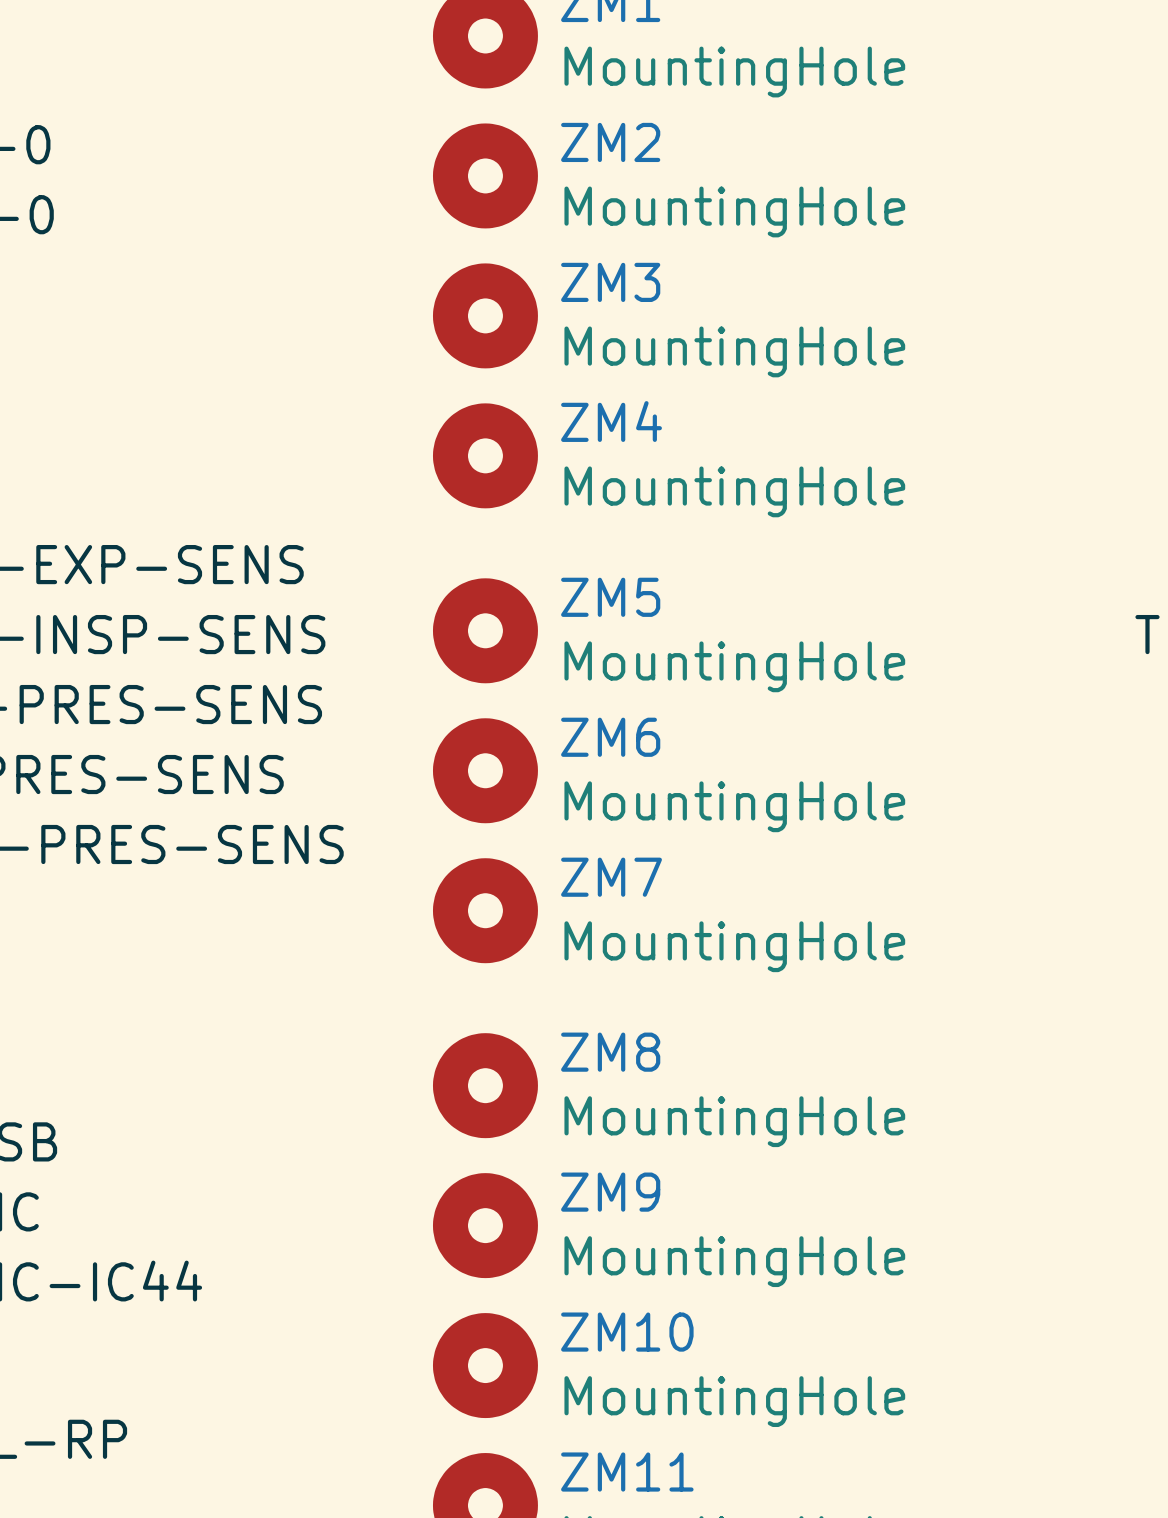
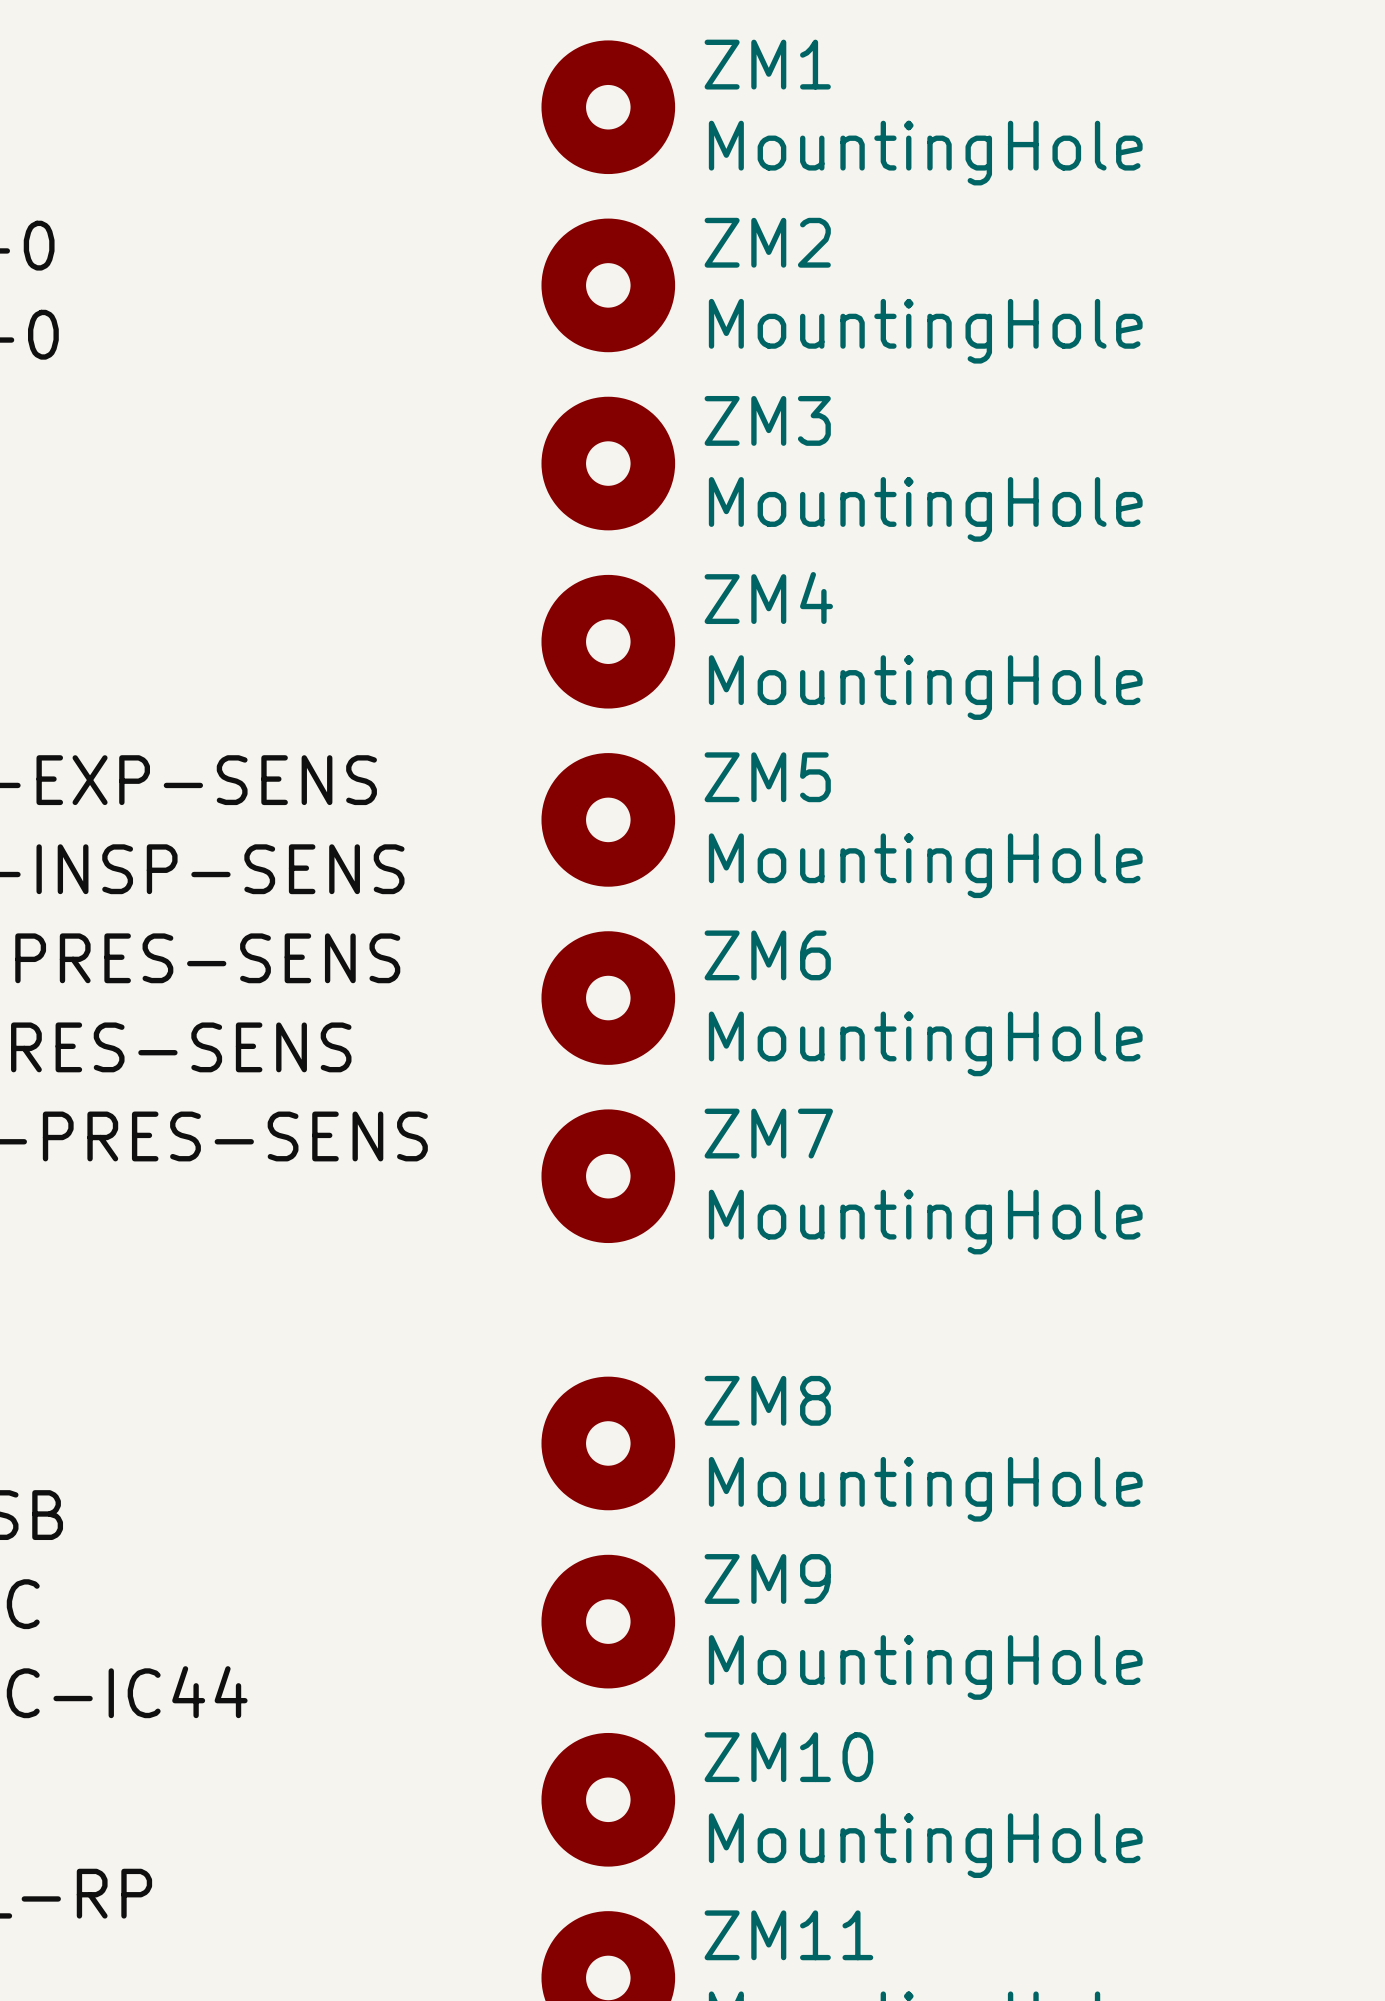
ZM5 position: (485, 630) -> (608, 819)
ZM6 position: (485, 770) -> (608, 998)
ZM7 position: (485, 910) -> (608, 1176)

